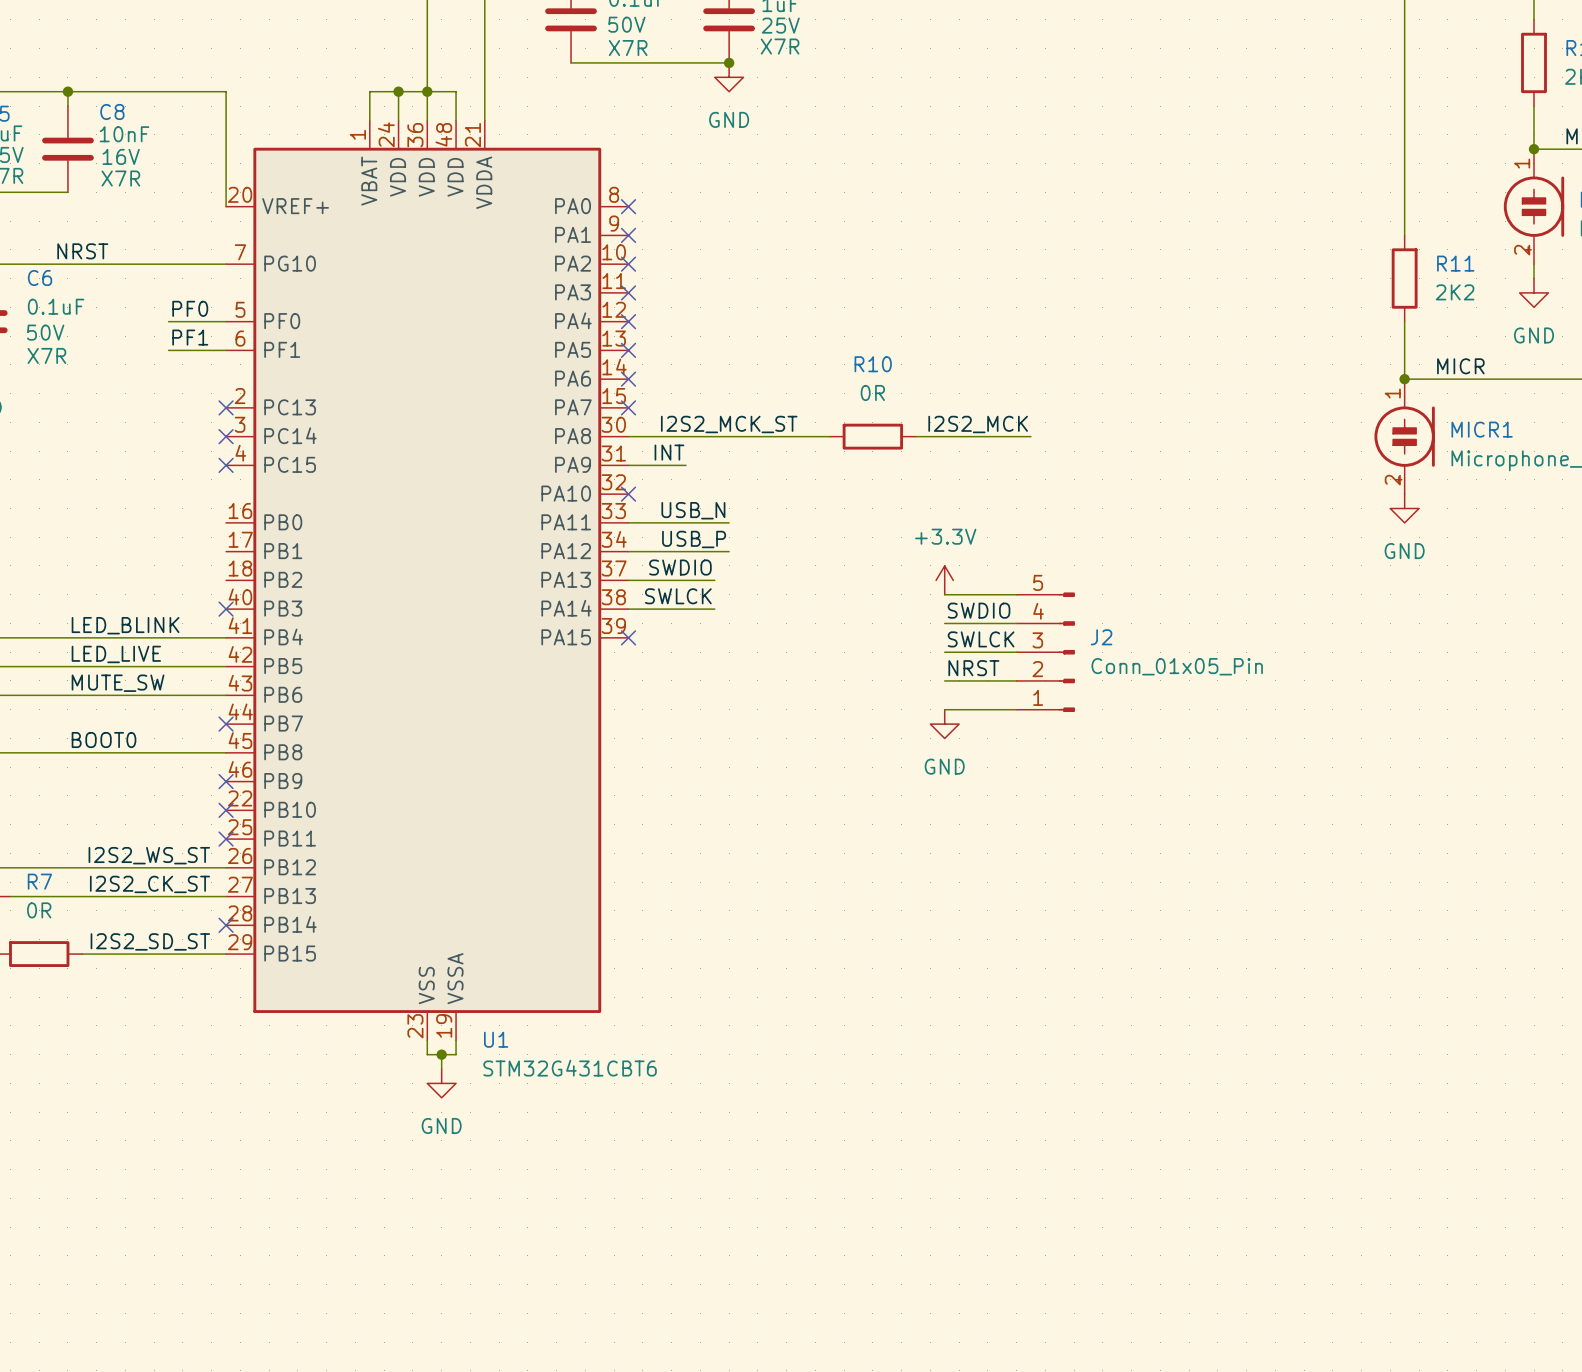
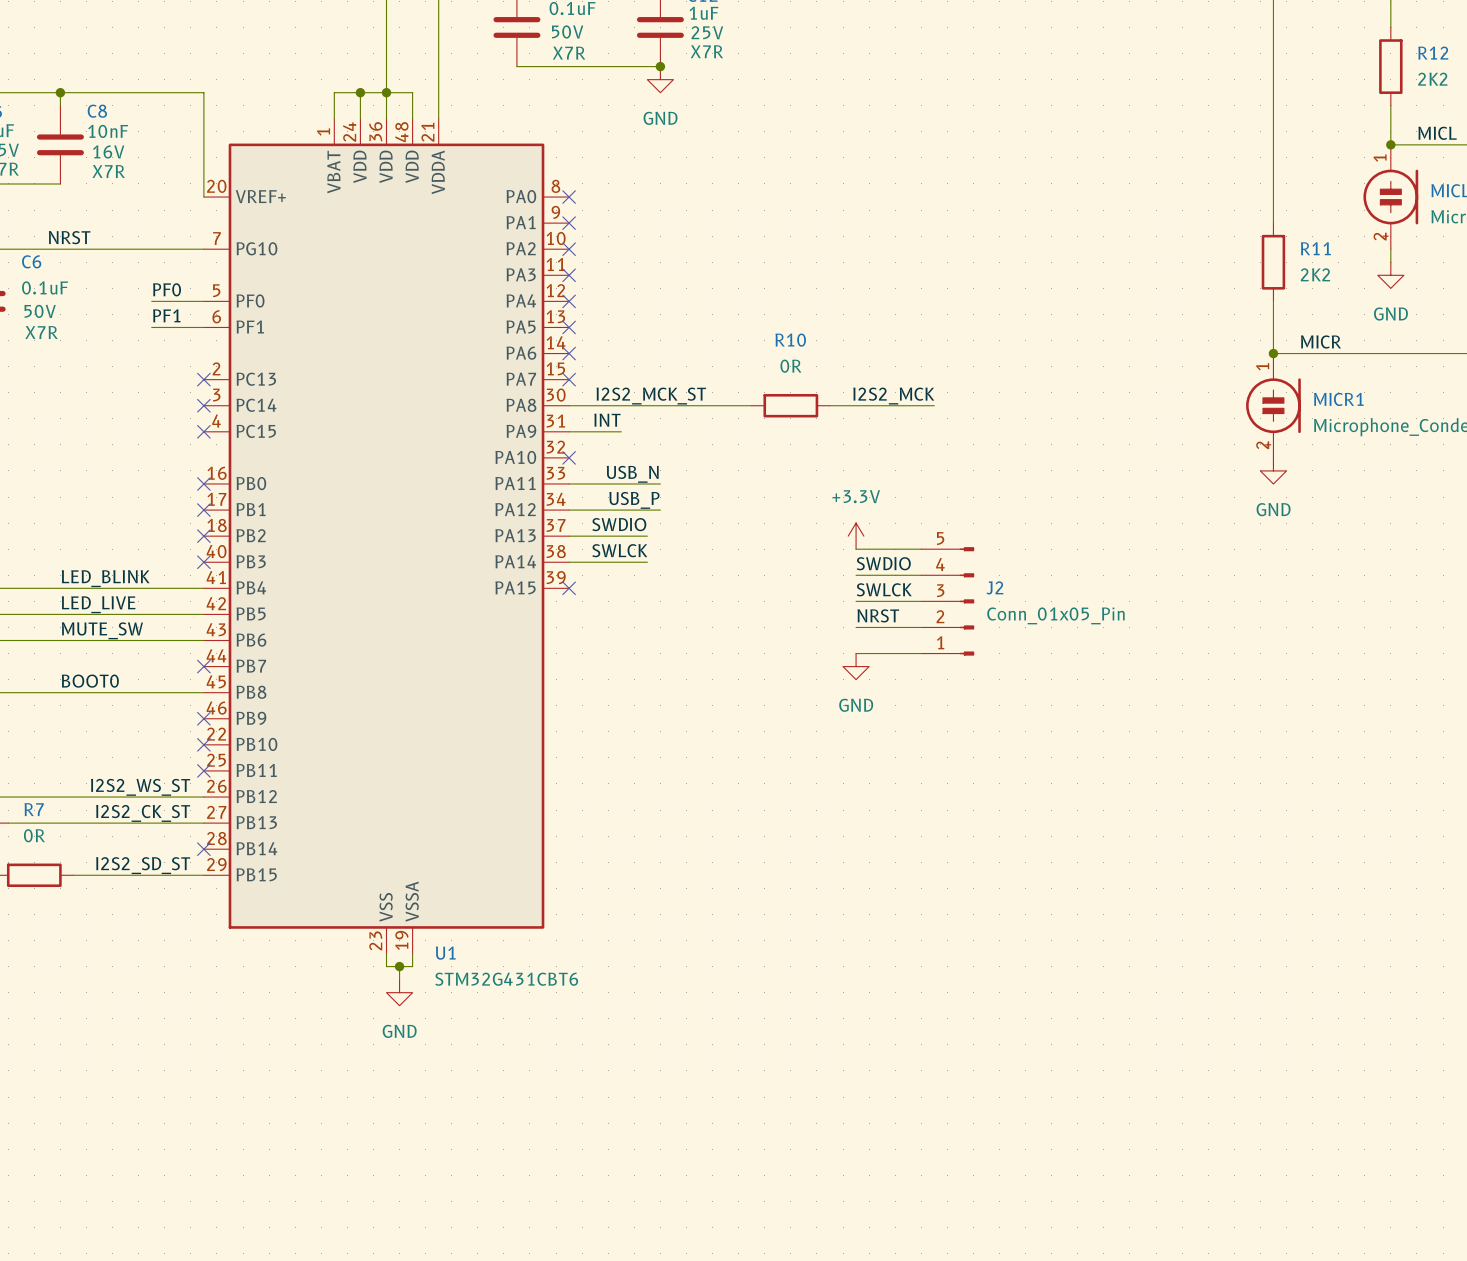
no-connect mark: none -> (203, 483)
no-connect mark: none -> (203, 510)
no-connect mark: none -> (203, 536)

